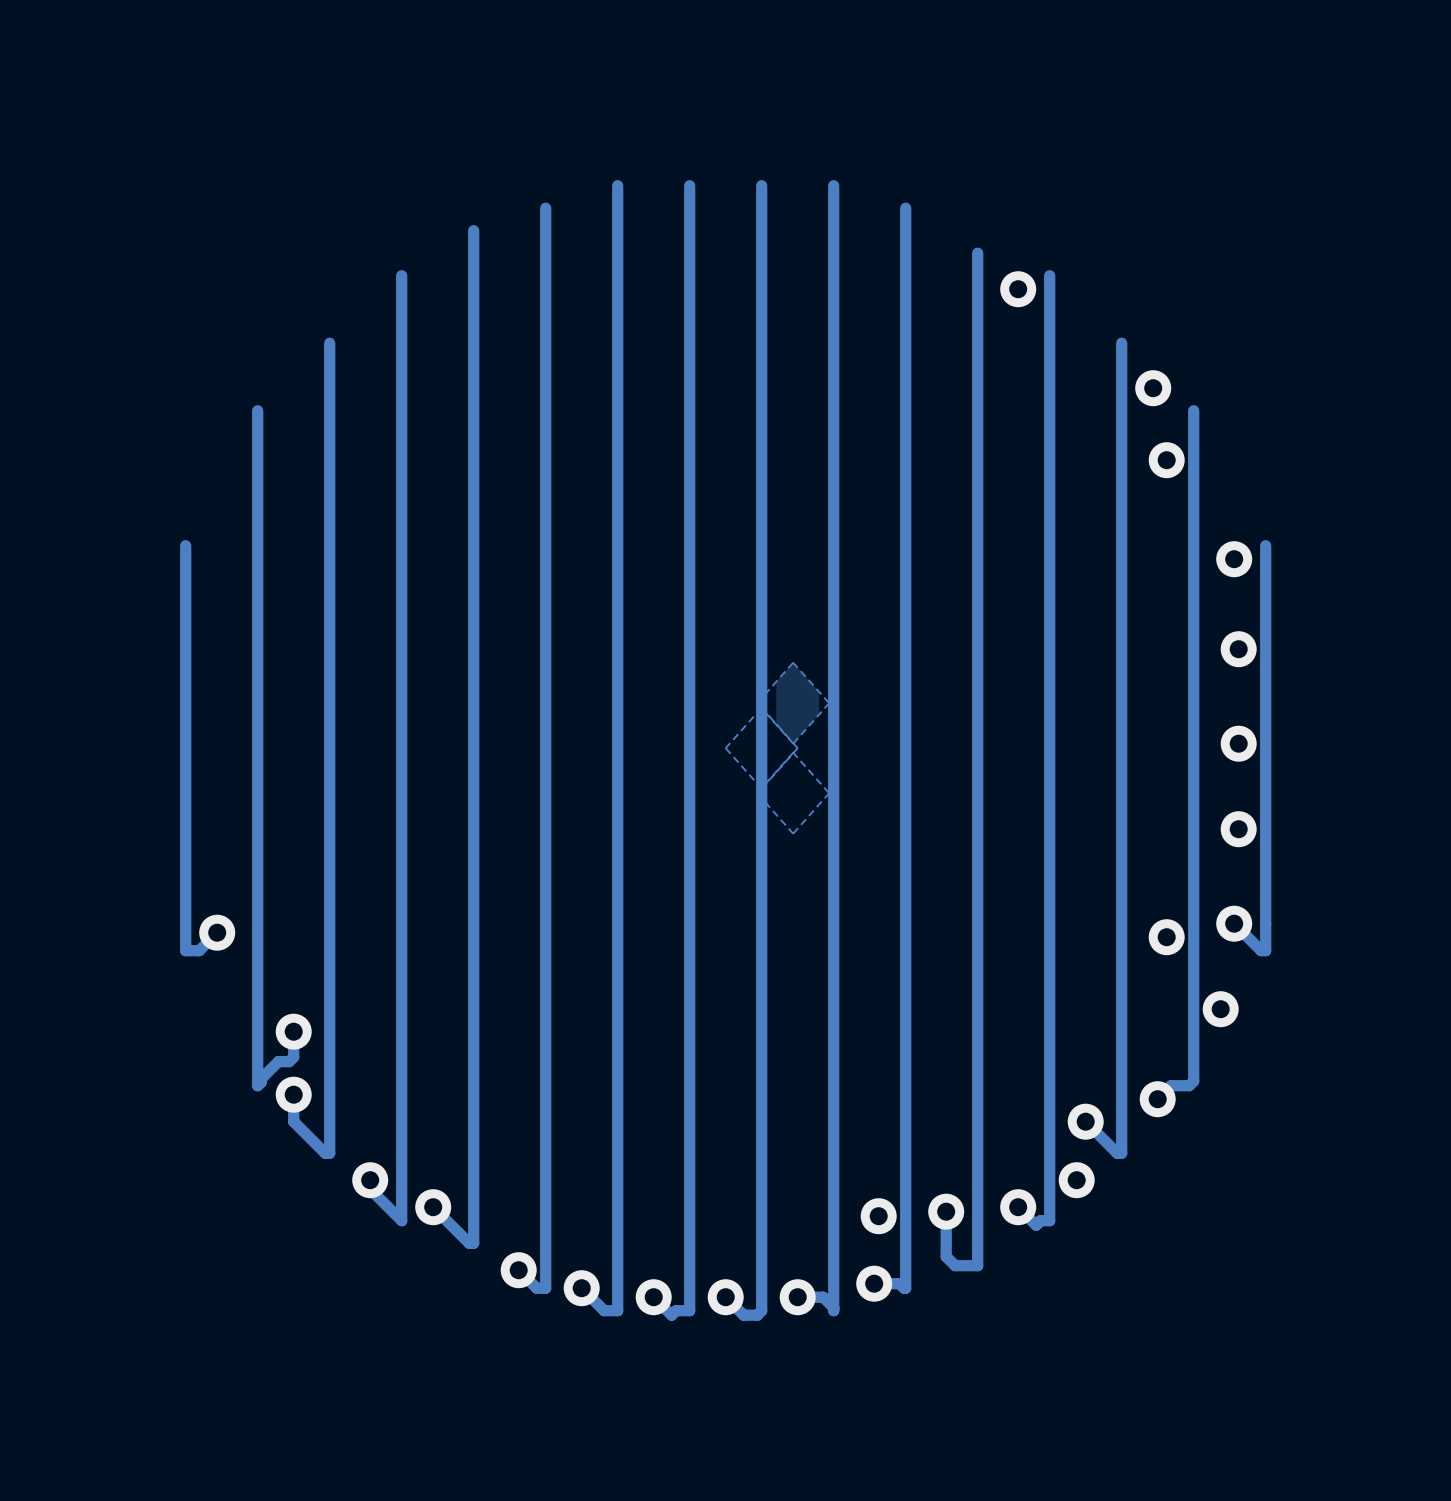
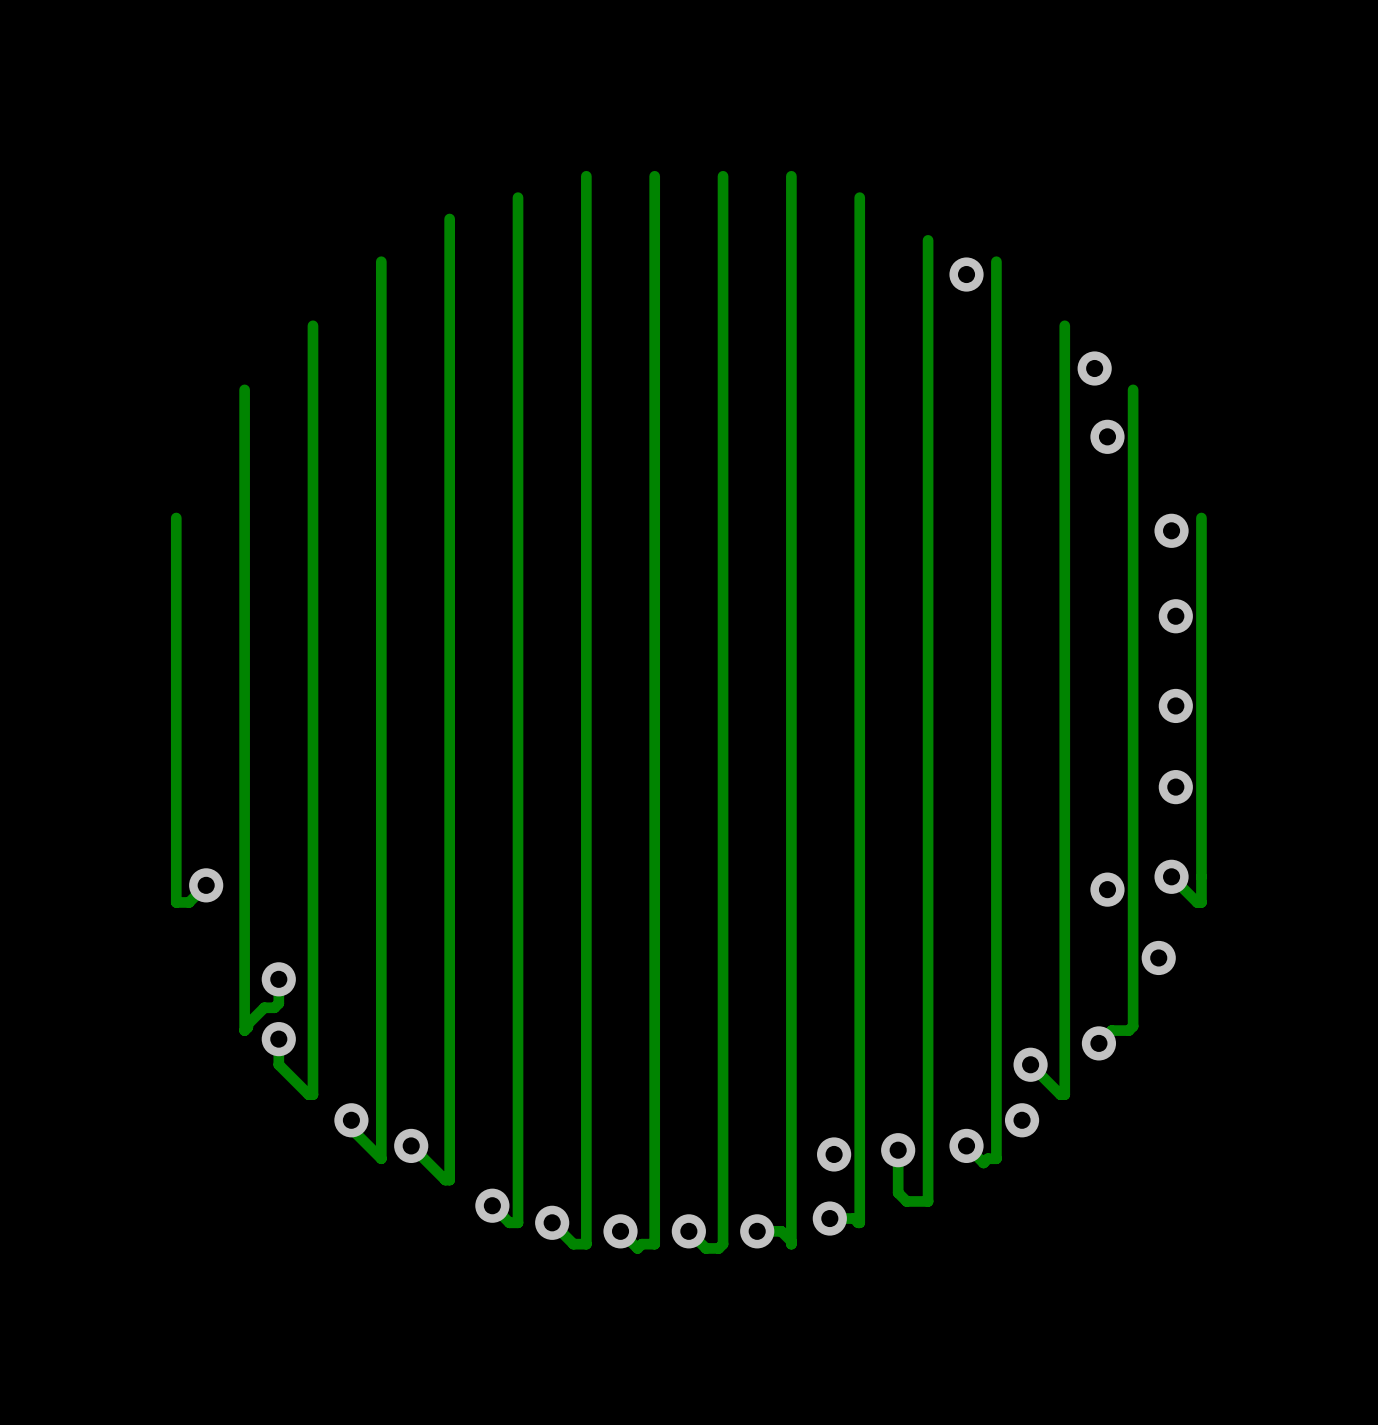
zone outline: (793, 662) (829, 703) (793, 743) (757, 703) (793, 662) -> none
zone outline: (761, 707) (797, 748) (761, 788) (725, 748) (761, 707) -> none
zone outline: (793, 752) (829, 793) (793, 833) (757, 793) (793, 752) -> none

